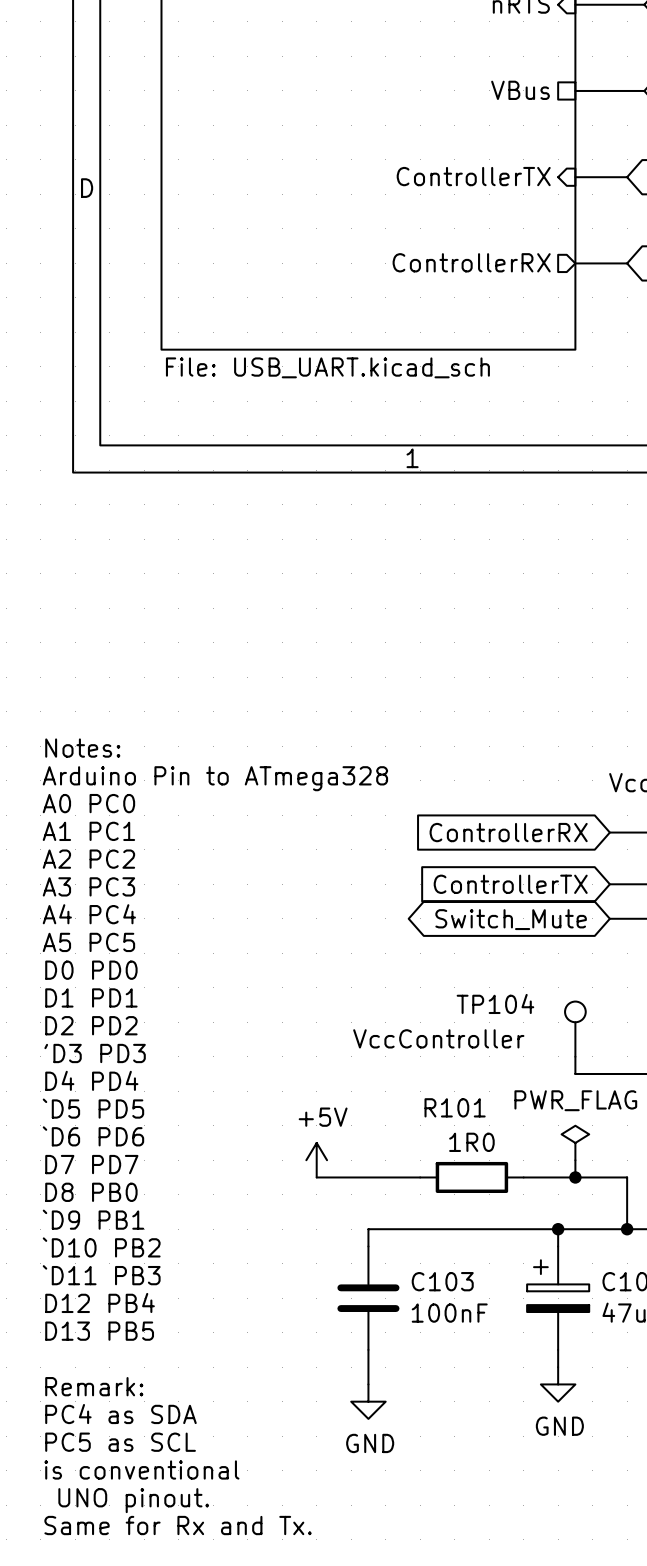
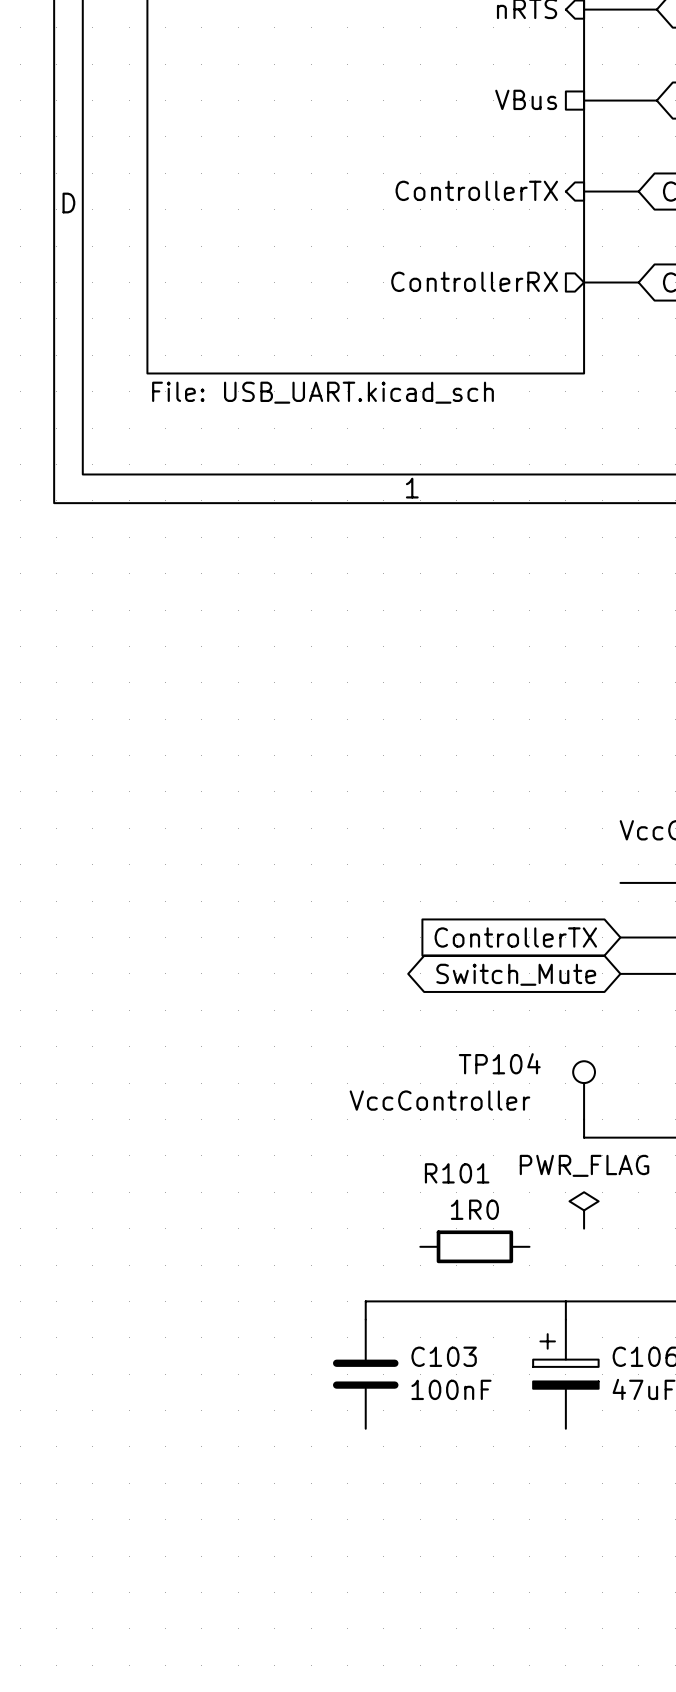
text: Notes: (82, 748) -> none
text: Arduino Pin to ATmega328 (215, 778) -> none
text: A0 PC0 (88, 803) -> none
text: A1 PC1 (88, 831) -> none
global label: ControllerRX (508, 832) -> none
text: A2 PC2 (88, 859) -> none
text: A3 PC3 (88, 886) -> none
text: A4 PC4 (89, 914) -> none
text: A5 PC5 (88, 942) -> none
text: D0 PD0 (91, 970) -> none
text: D1 PD1 (91, 997) -> none
text: D2 PD2 (91, 1025) -> none
text: 'D3 PD3 (95, 1053) -> none
text: D4 PD4 (91, 1080) -> none
text: `D5 PD5 (93, 1108) -> none
text: `D6 PD6 (93, 1136) -> none
power symbol: +5V (316, 1160) -> none
wire: (575, 1160) (575, 1177) -> none
text: D7 PD7 (91, 1164) -> none
wire: (316, 1177) (420, 1177) -> none
wire: (523, 1177) (627, 1177) (627, 1229) -> none
junction: (575, 1177) -> none
text: D8 PB0 (91, 1192) -> none
text: `D9 PB1 (93, 1219) -> none
junction: (558, 1229) -> none
junction: (627, 1229) -> none
text: `D10 PB2 (101, 1247) -> none
text: `D11 PB3 (101, 1275) -> none
text: D12 PB4 (100, 1302) -> none
text: D13 PB5 (99, 1331) -> none
wire: (368, 1349) (368, 1384) -> none
wire: (558, 1349) (558, 1367) -> none
power symbol: GND (558, 1384) -> none
text: Remark: (94, 1386) -> none
power symbol: GND (368, 1401) -> none
text: PC4 as SDA (120, 1414) -> none
text: PC5 as SCL (120, 1442) -> none
text: is conventional (141, 1469) -> none
text: UNO pinout. (133, 1500) -> none
text: Same for Rx and Tx. (178, 1525) -> none

